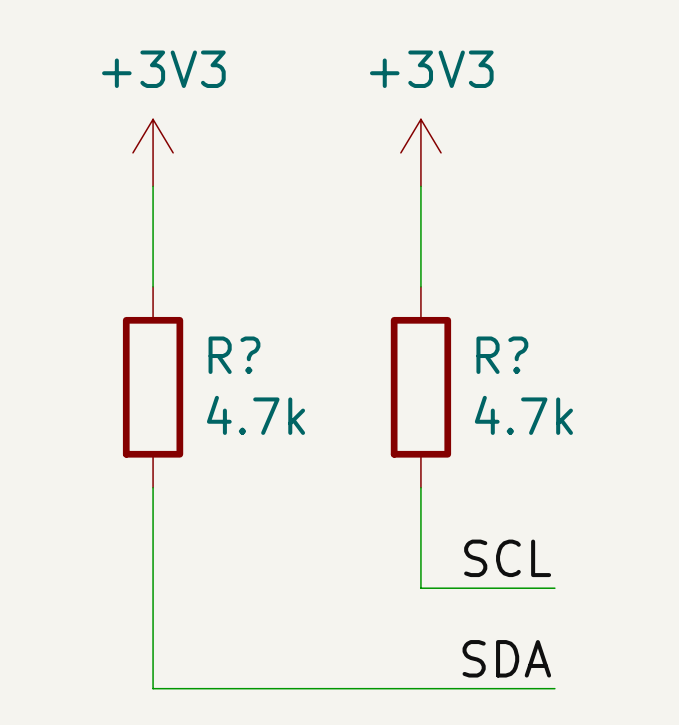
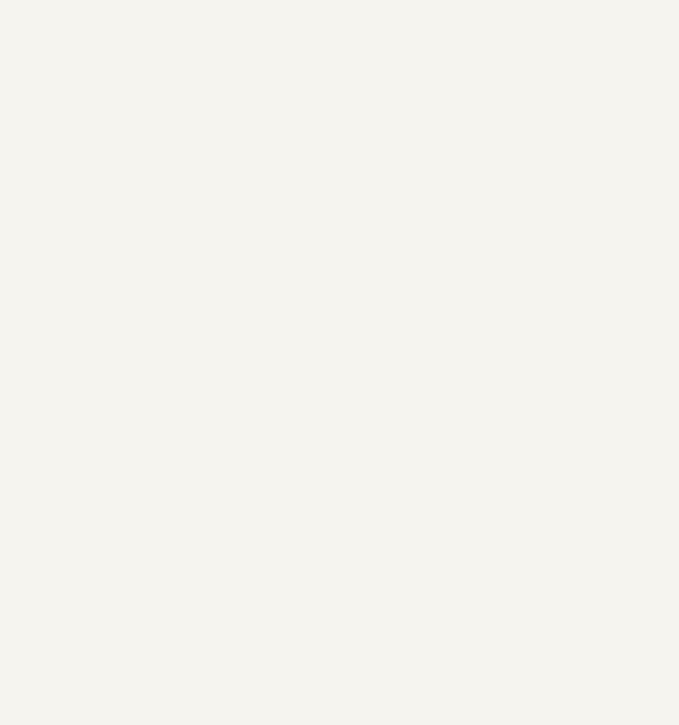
power symbol: +3V3 (153, 152) -> none
power symbol: +3V3 (420, 152) -> none
wire: (153, 186) (153, 286) -> none
wire: (420, 186) (420, 286) -> none
R?: 4.7k (153, 387) -> none
R?: 4.7k (420, 387) -> none
wire: (153, 487) (153, 688) (554, 688) -> none
wire: (420, 487) (420, 588) (554, 588) -> none
label: SCL (507, 558) -> none
label: SDA (506, 658) -> none

